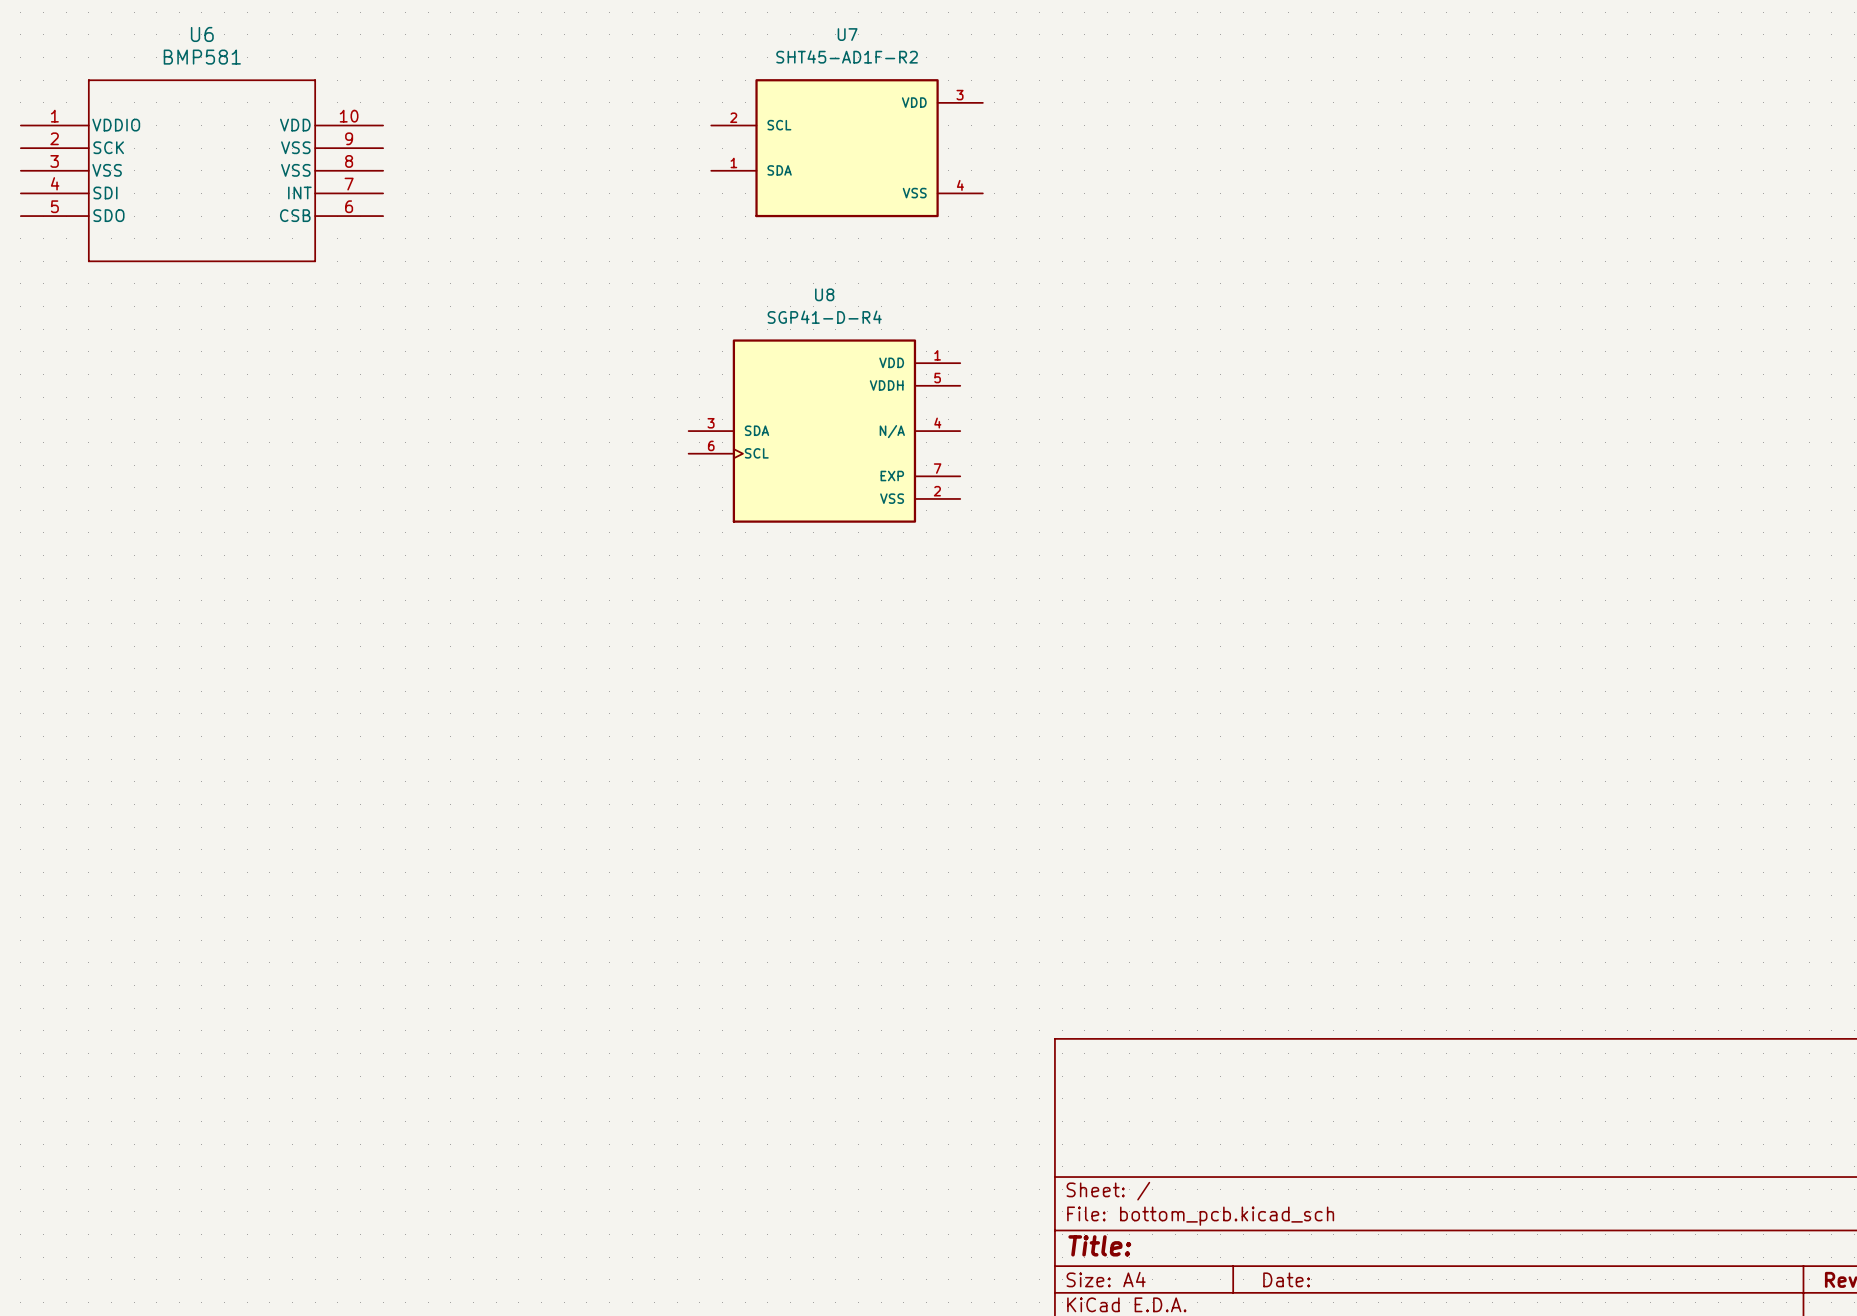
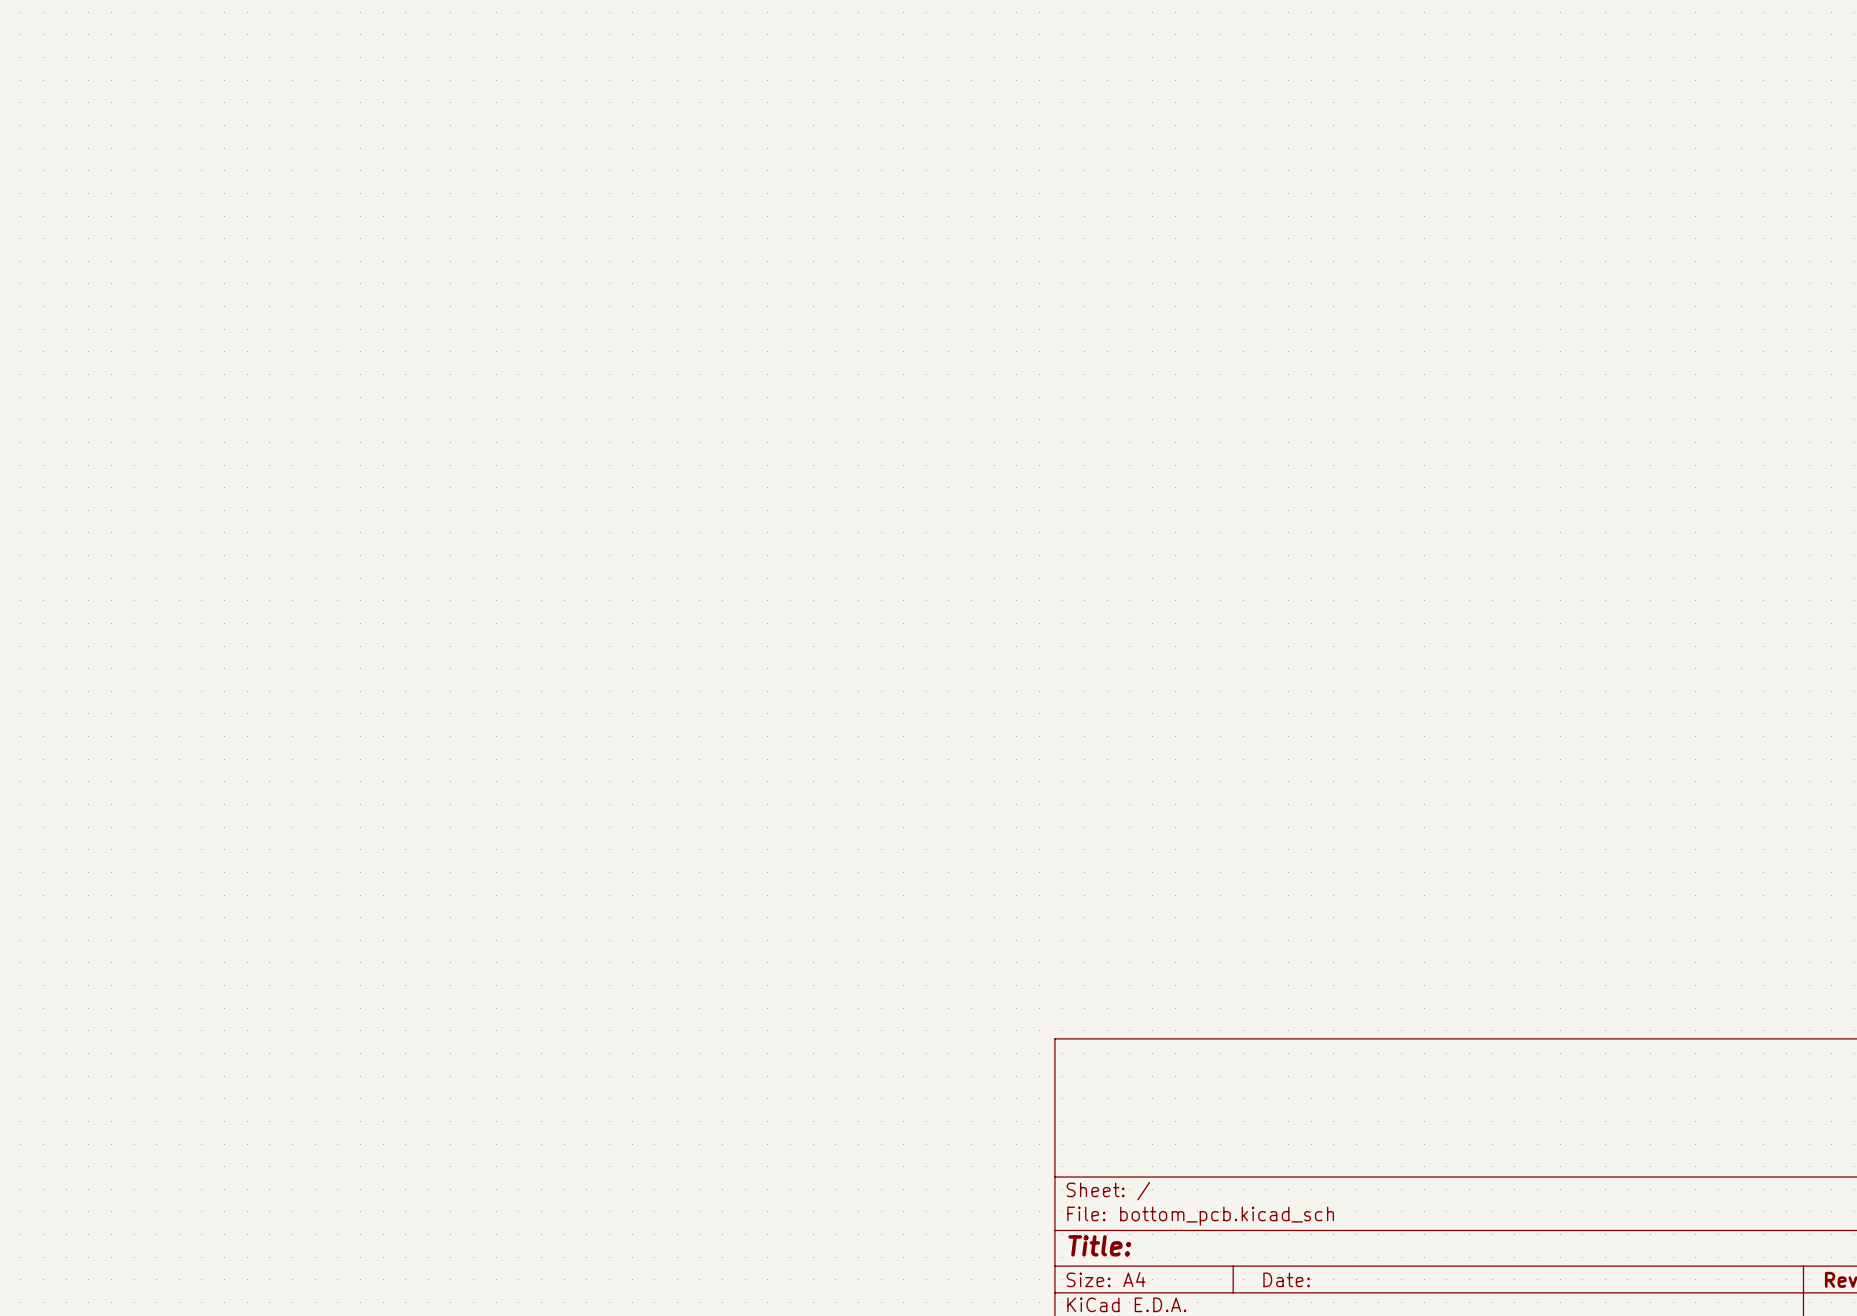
U7: SHT45-AD1F-R2 (847, 148) -> none
U6: BMP581 (201, 170) -> none
U8: SGP41-D-R4 (824, 431) -> none

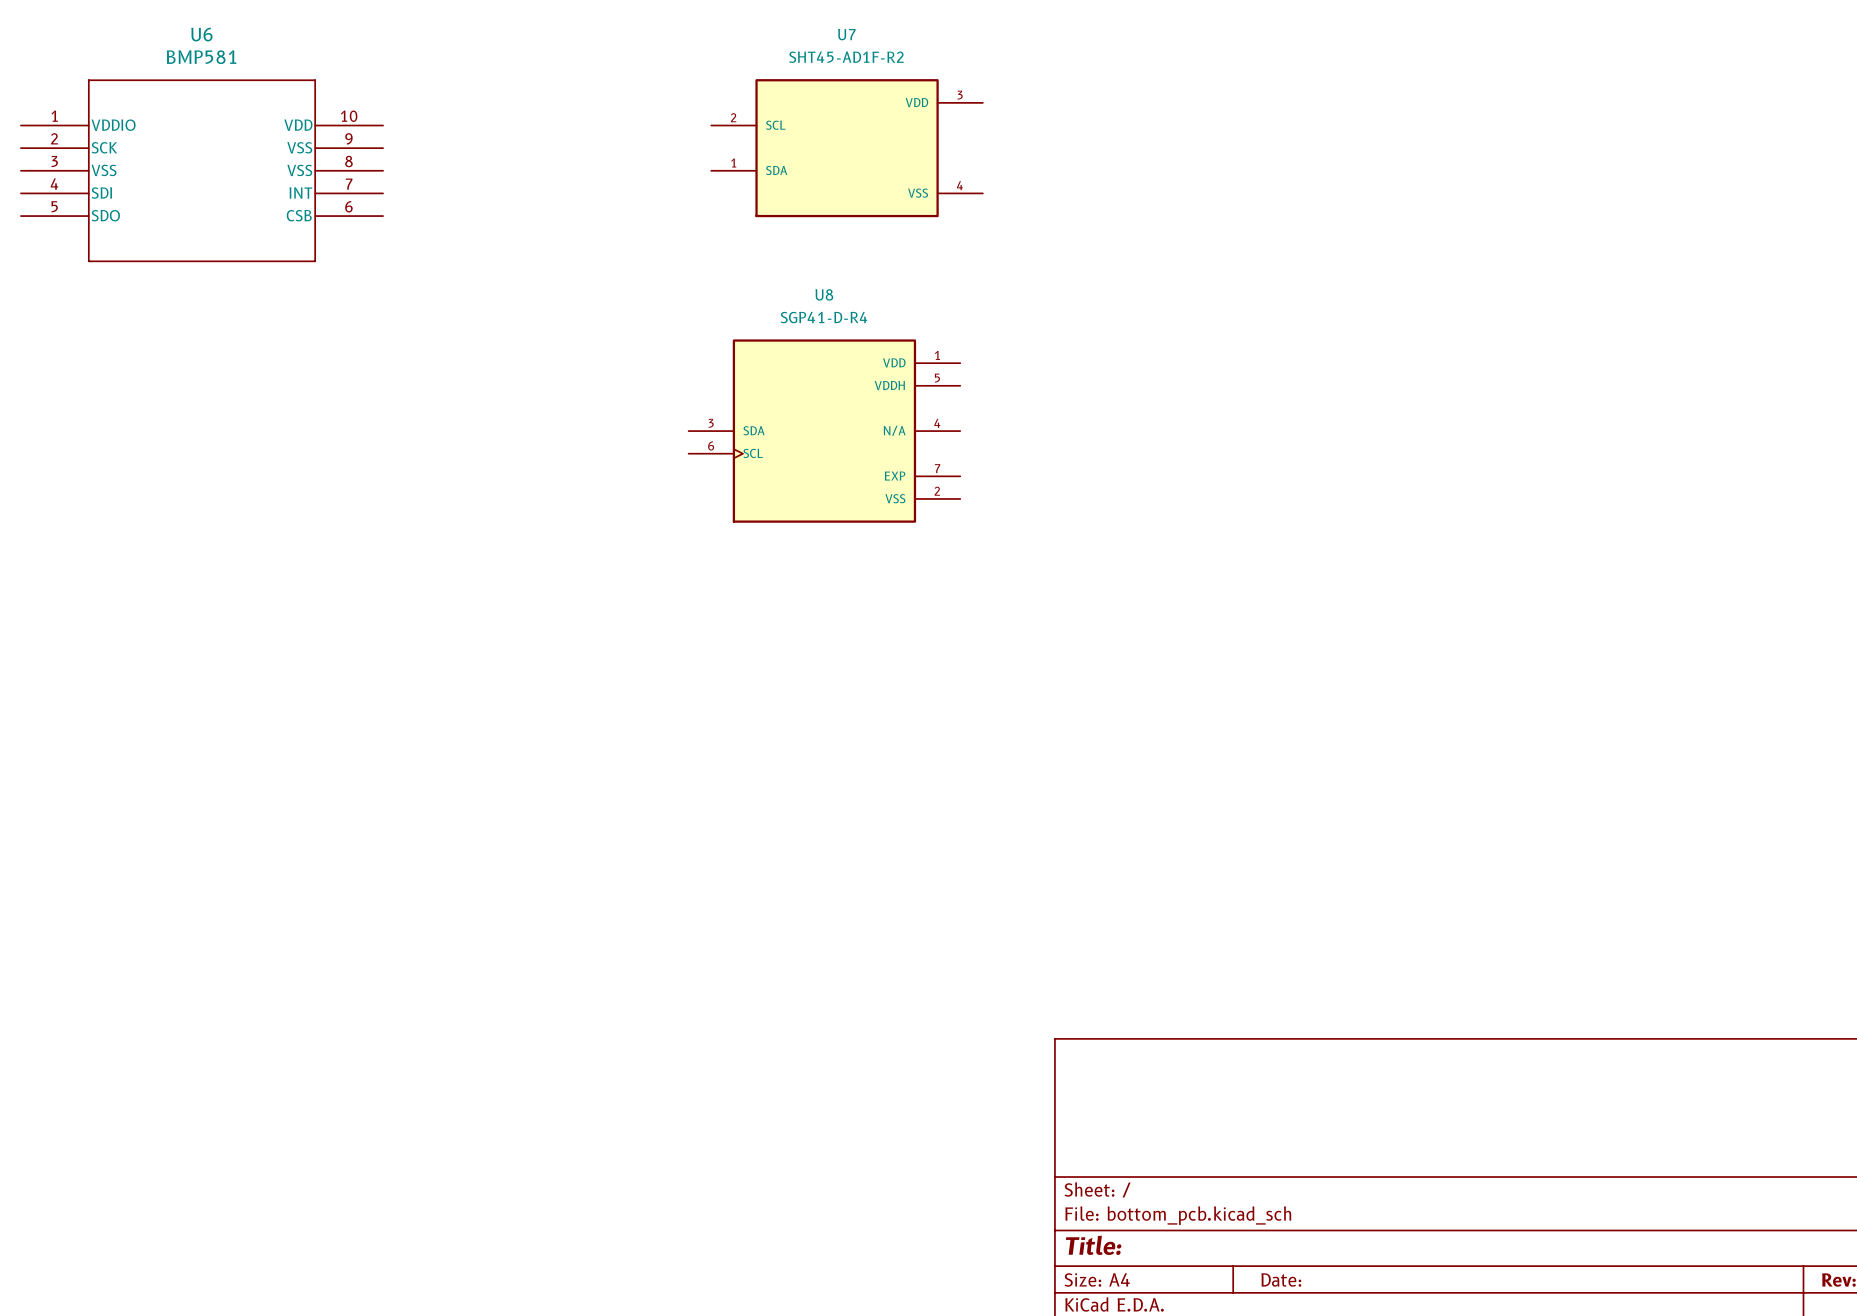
U7: none -> SHT45-AD1F-R2 (847, 148)
U6: none -> BMP581 (201, 170)
U8: none -> SGP41-D-R4 (824, 431)

